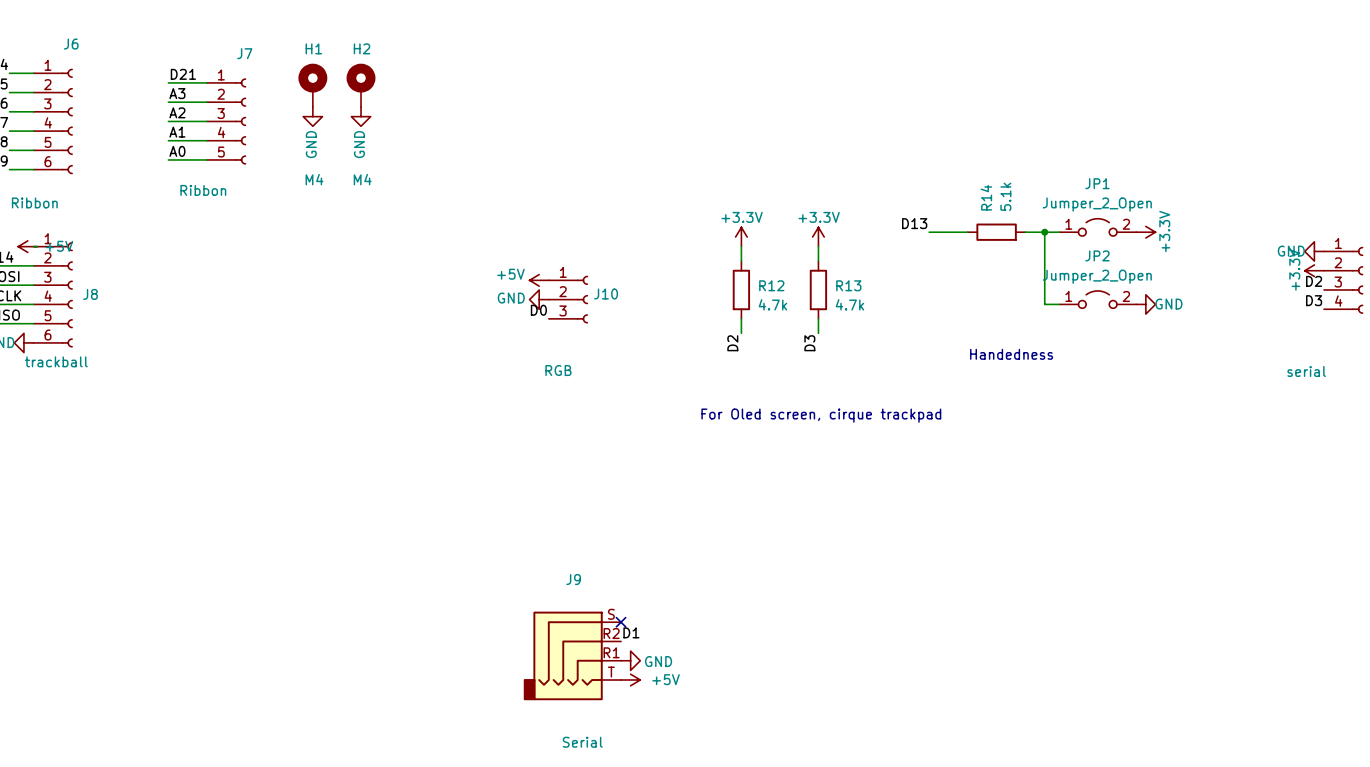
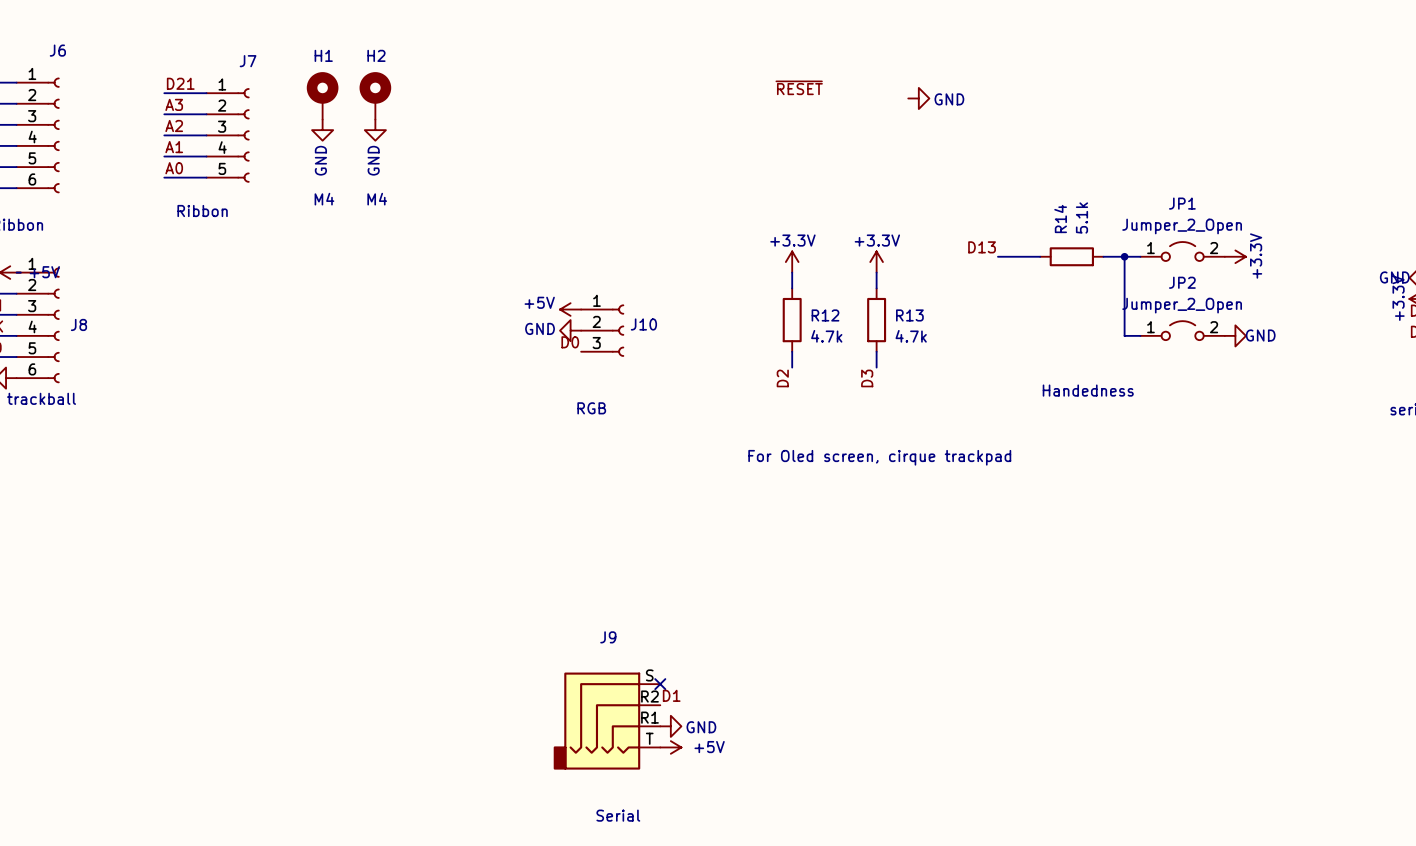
label: none -> ~{RESET} (799, 87)
power symbol: none -> GND (918, 98)

